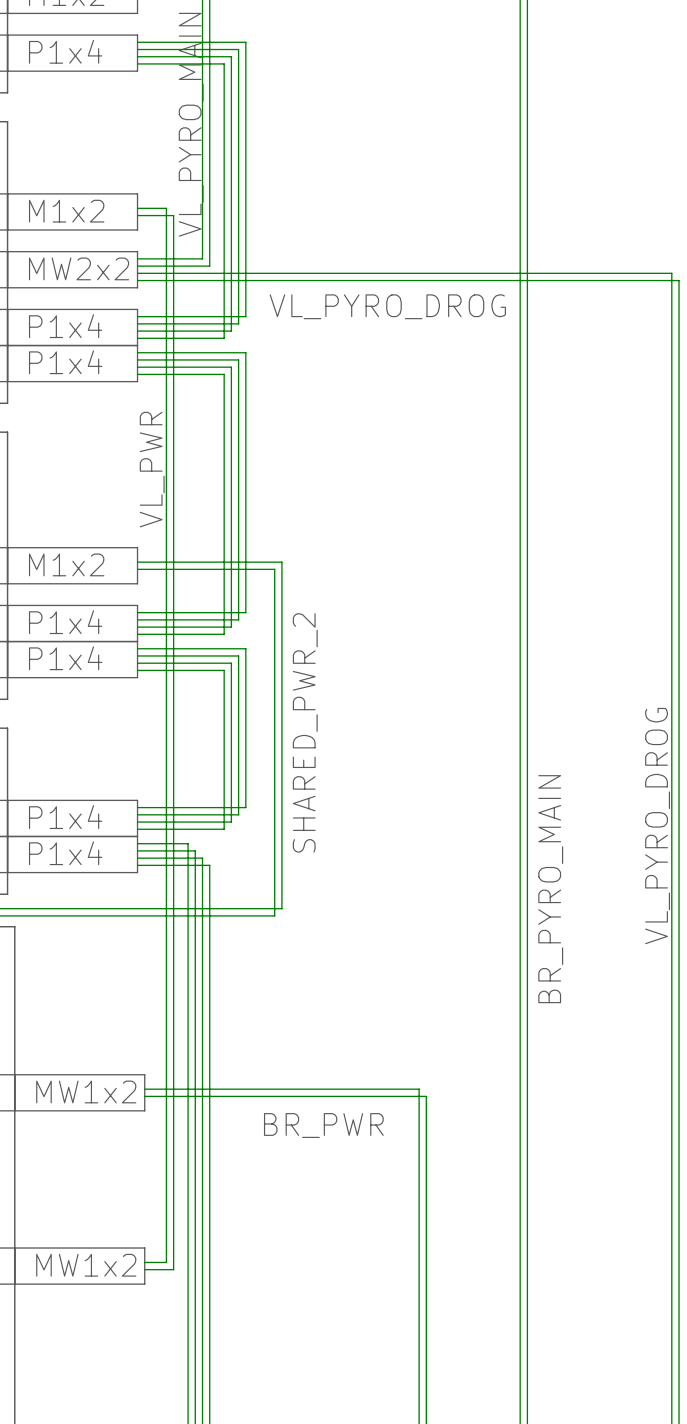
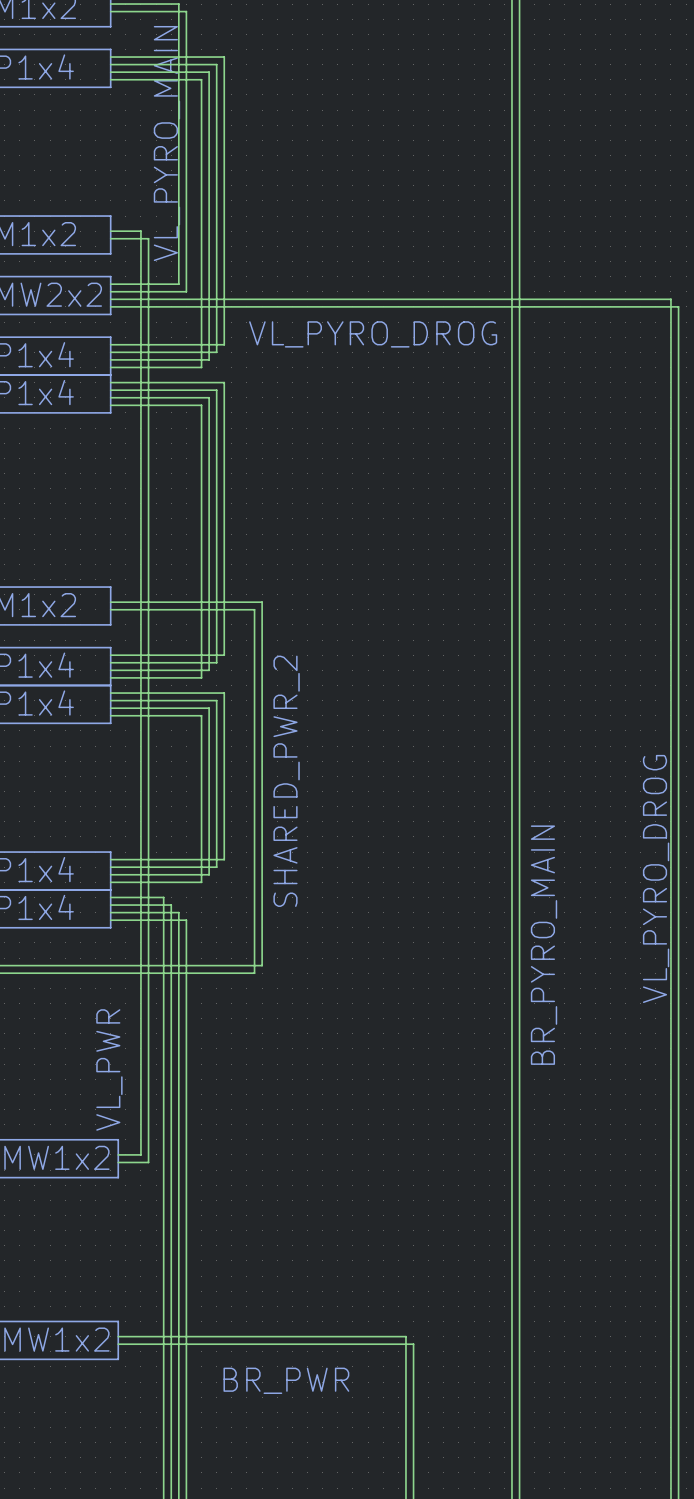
text: VL_PWR (152, 469) -> none
text: none -> VL_PWR (109, 1069)
text: BR_PWR (323, 1125) -> none
wire: (166, 1262) (166, 1089) (419, 1089) (419, 1262) -> (140, 1336) (405, 1336)
wire: (173, 1269) (173, 1096) (426, 1096) (426, 1269) -> (148, 1344) (413, 1344)
text: none -> BR_PWR (286, 1380)

